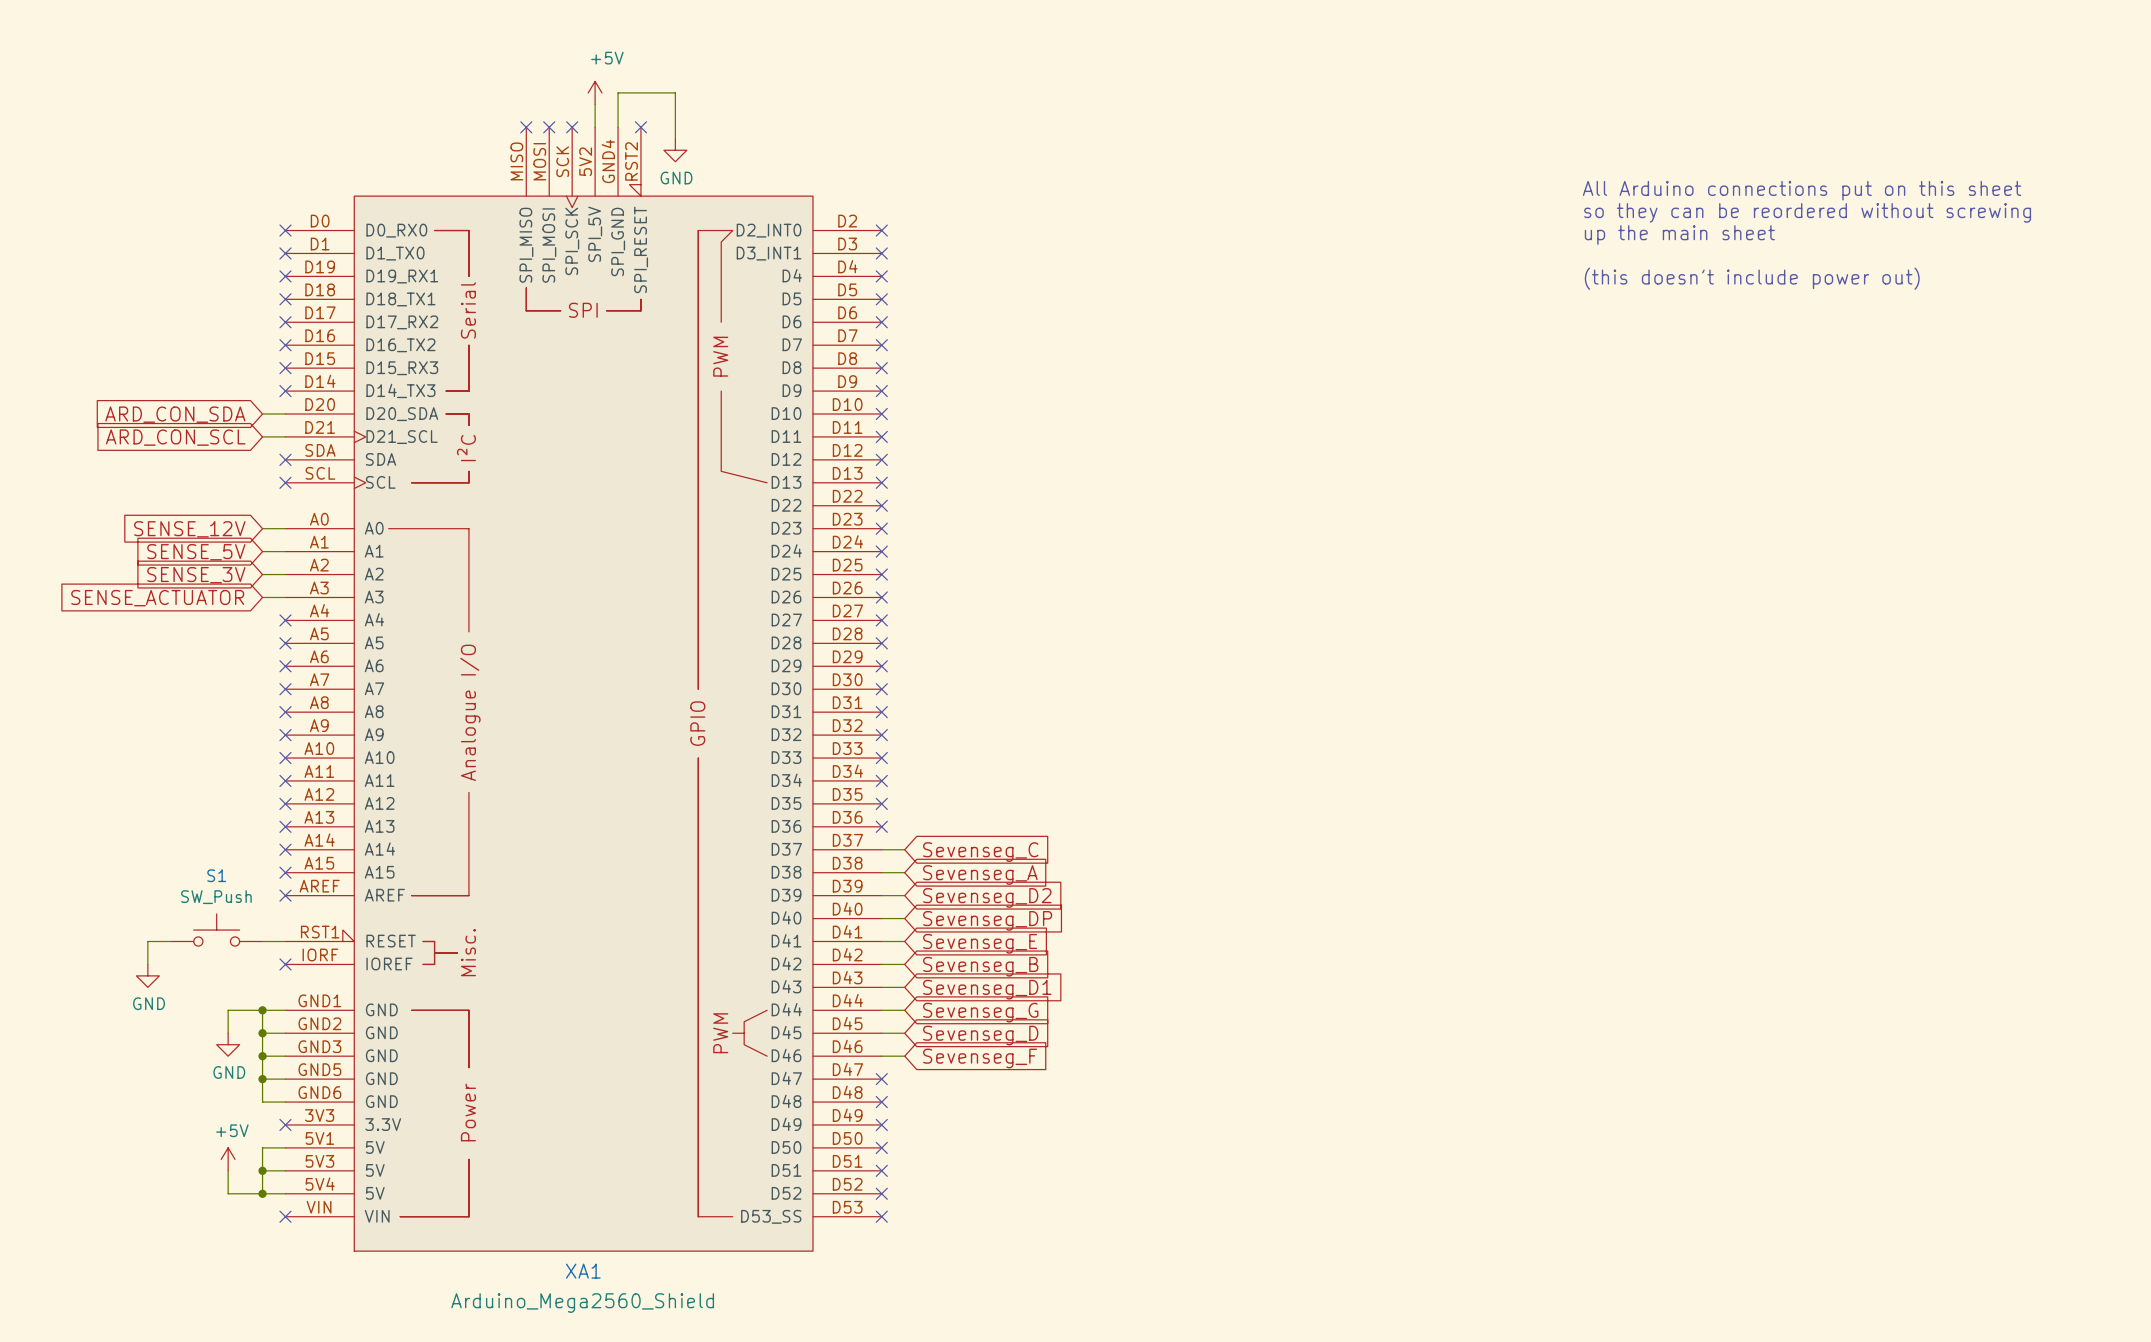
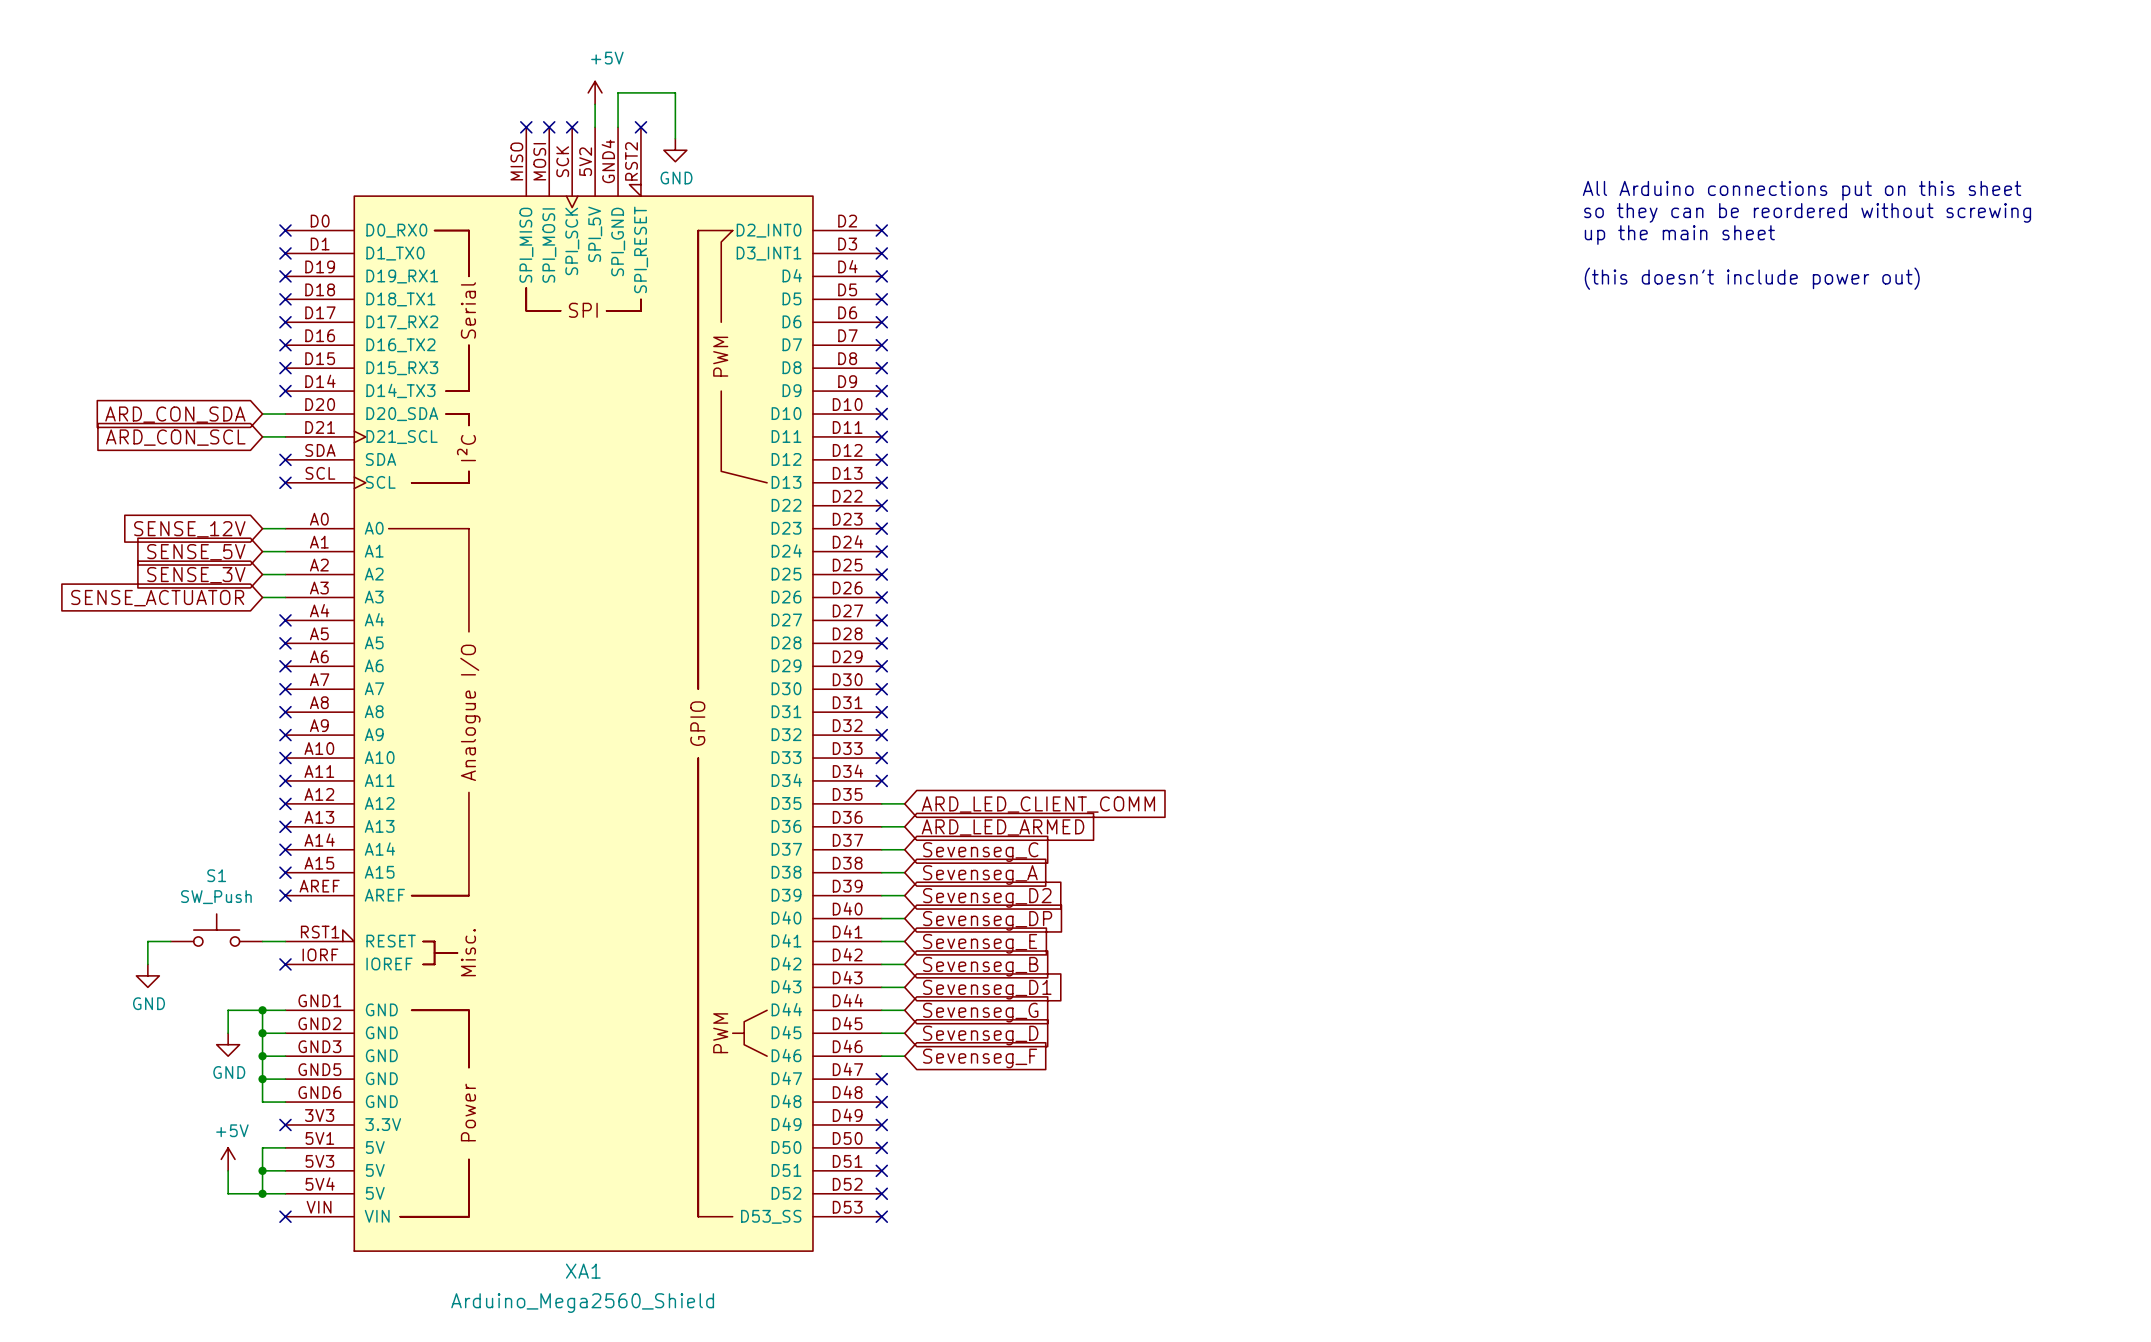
wire: none -> (881, 803) (904, 803)
no-connect mark: (881, 803) -> none
global label: none -> ARD_LED_CLIENT_COMM (1038, 804)
wire: none -> (881, 826) (904, 826)
no-connect mark: (881, 826) -> none
global label: none -> ARD_LED_ARMED (1003, 827)

